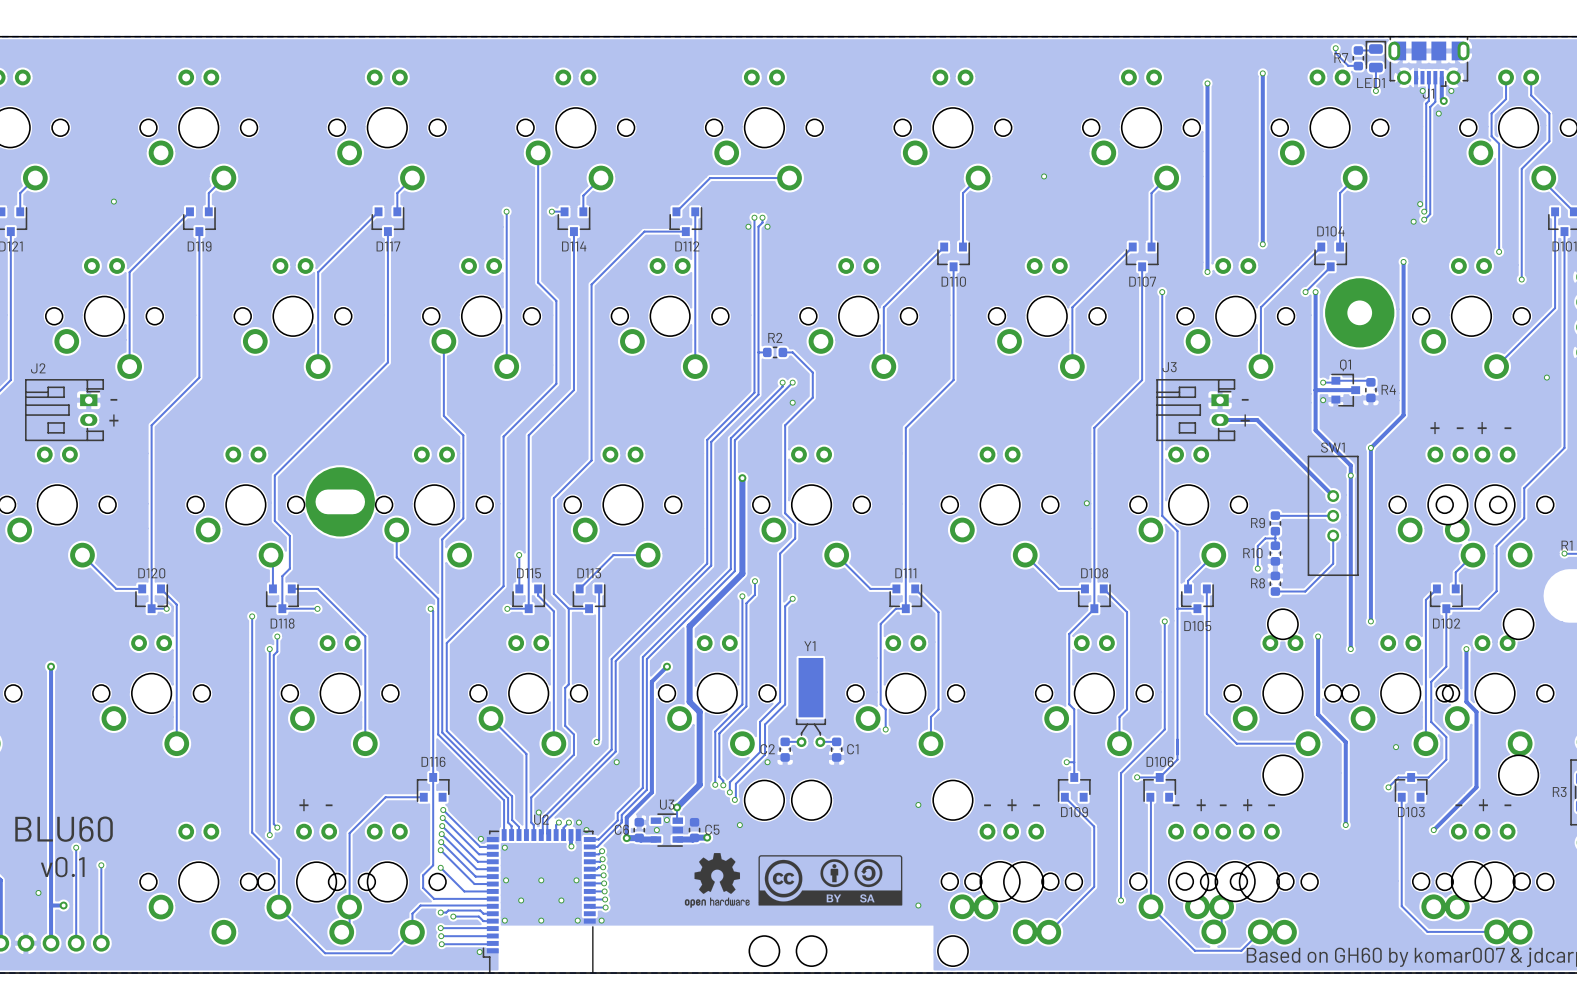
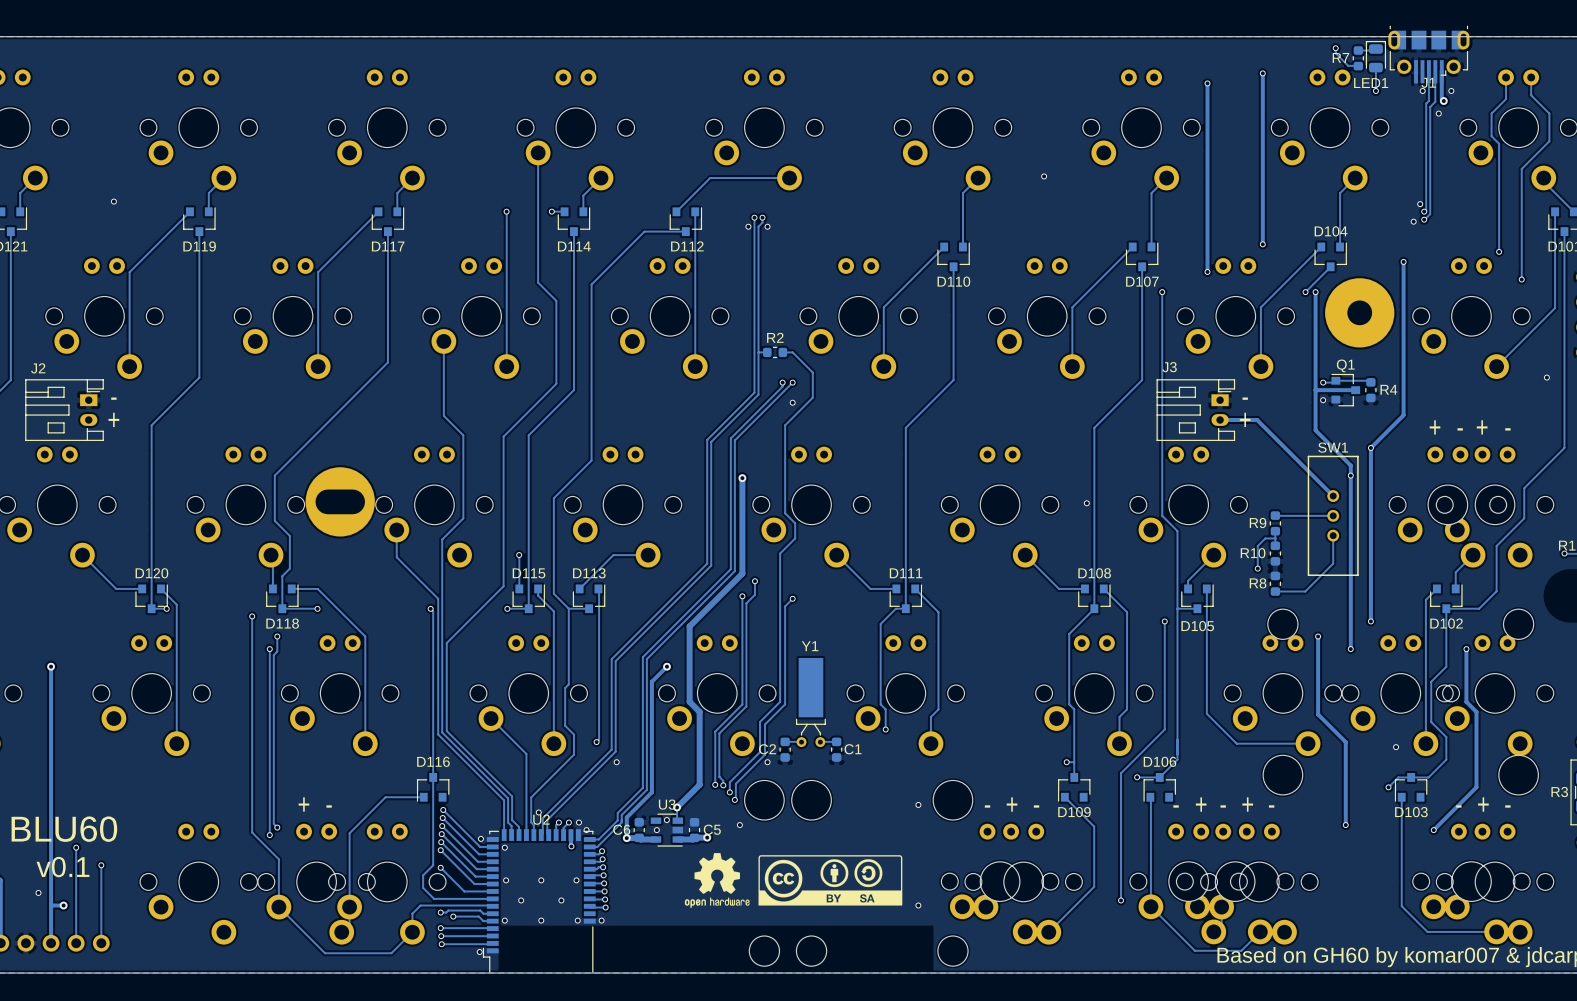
J1 footprint: [1388, 36, 1470, 87] -> [1388, 25, 1470, 84]

